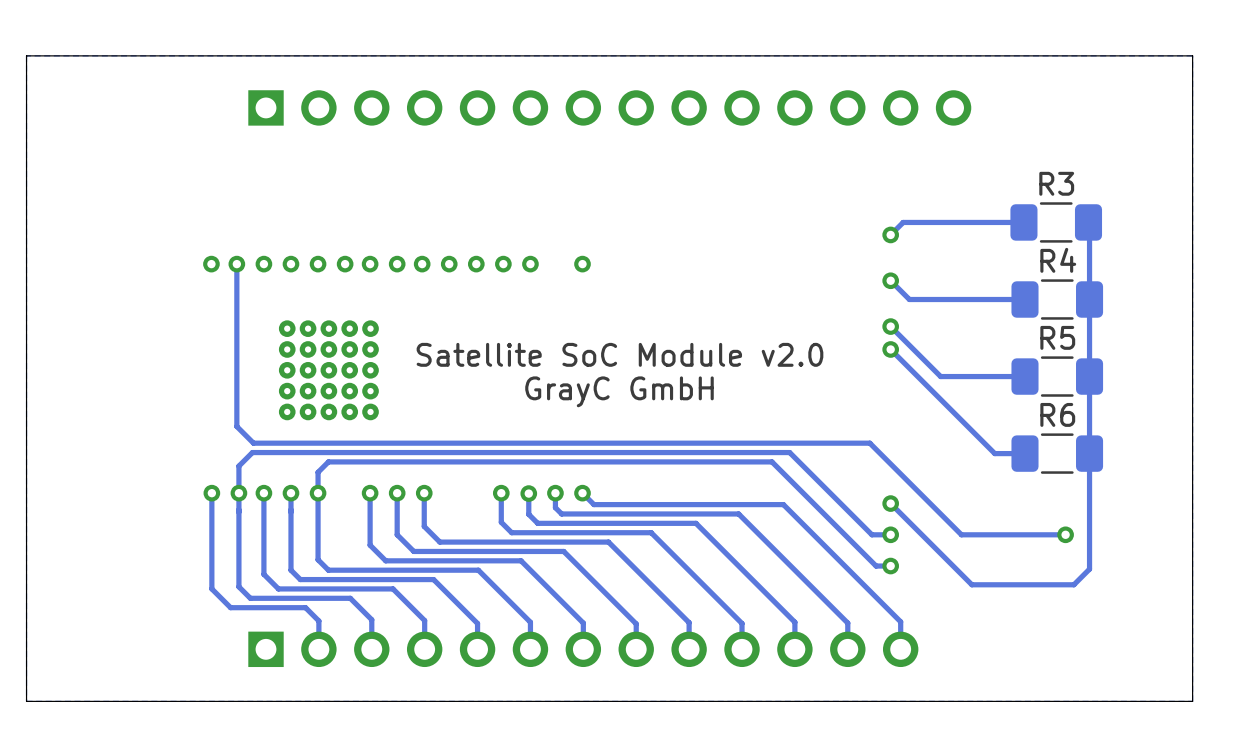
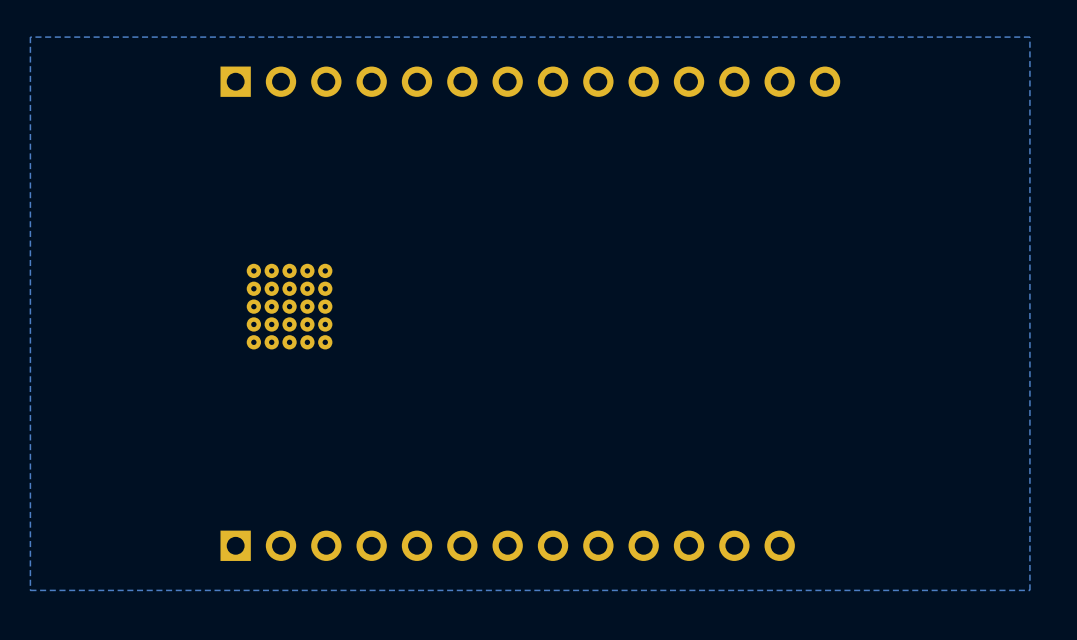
board edge: (1192, 55) (1192, 701) (26, 701) (26, 55) (1192, 55) -> none
track: (1023, 222) (903, 222) (890, 234) -> none
R3: (1056, 222) -> none
track: (1088, 222) (1089, 569) (1073, 584) (971, 584) (890, 503) -> none
via: (890, 234) -> none
via: (211, 264) -> none
track: (236, 264) (236, 426) (253, 443) (869, 443) (961, 534) (1065, 534) -> none
via: (236, 264) -> none
via: (263, 264) -> none
via: (290, 264) -> none
via: (318, 264) -> none
via: (345, 264) -> none
via: (370, 264) -> none
via: (397, 264) -> none
via: (422, 264) -> none
via: (449, 264) -> none
via: (476, 264) -> none
via: (503, 264) -> none
via: (530, 264) -> none
via: (582, 264) -> none
track: (890, 280) (909, 299) (1024, 299) -> none
via: (890, 280) -> none
R4: (1057, 299) -> none
track: (890, 326) (940, 376) (1024, 376) -> none
via: (890, 326) -> none
track: (890, 349) (994, 453) (1024, 453) -> none
via: (890, 349) -> none
text: Satellite SoC Module v2.0 (619, 354) -> none
R5: (1057, 376) -> none
text: GrayC GmbH (619, 391) -> none
R6: (1057, 453) -> none
track: (211, 493) (211, 588) (230, 607) (305, 607) (318, 621) (318, 649) -> none
via: (211, 493) -> none
via: (238, 493) -> none
track: (263, 493) (263, 574) (278, 588) (393, 588) (424, 620) (424, 649) -> none
via: (263, 493) -> none
track: (290, 493) (290, 570) (300, 579) (433, 579) (477, 623) (477, 649) -> none
via: (290, 493) -> none
via: (318, 493) -> none
track: (370, 493) (370, 545) (385, 560) (521, 560) (583, 623) (583, 649) -> none
via: (370, 493) -> none
track: (397, 493) (397, 534) (413, 551) (563, 551) (636, 623) (636, 649) -> none
via: (397, 493) -> none
track: (424, 493) (424, 526) (439, 542) (608, 542) (689, 622) (689, 649) -> none
via: (424, 493) -> none
track: (501, 493) (501, 522) (511, 532) (651, 532) (742, 623) (742, 649) -> none
via: (501, 493) -> none
track: (528, 493) (528, 514) (537, 523) (695, 523) (794, 622) (794, 649) -> none
via: (528, 493) -> none
track: (555, 493) (555, 507) (561, 513) (738, 513) (847, 623) (847, 649) -> none
via: (555, 493) -> none
track: (582, 493) (593, 504) (783, 504) (900, 621) (900, 649) -> none
via: (582, 493) -> none
via: (890, 503) -> none
track: (890, 534) (871, 534) (789, 452) (252, 452) (238, 466) (238, 586) (250, 598) (350, 598) (371, 619) (371, 649) -> none
via: (890, 534) -> none
via: (1065, 534) -> none
track: (890, 566) (876, 566) (771, 461) (328, 461) (318, 472) (318, 559) (328, 570) (478, 570) (530, 622) (530, 649) -> none
via: (890, 566) -> none

